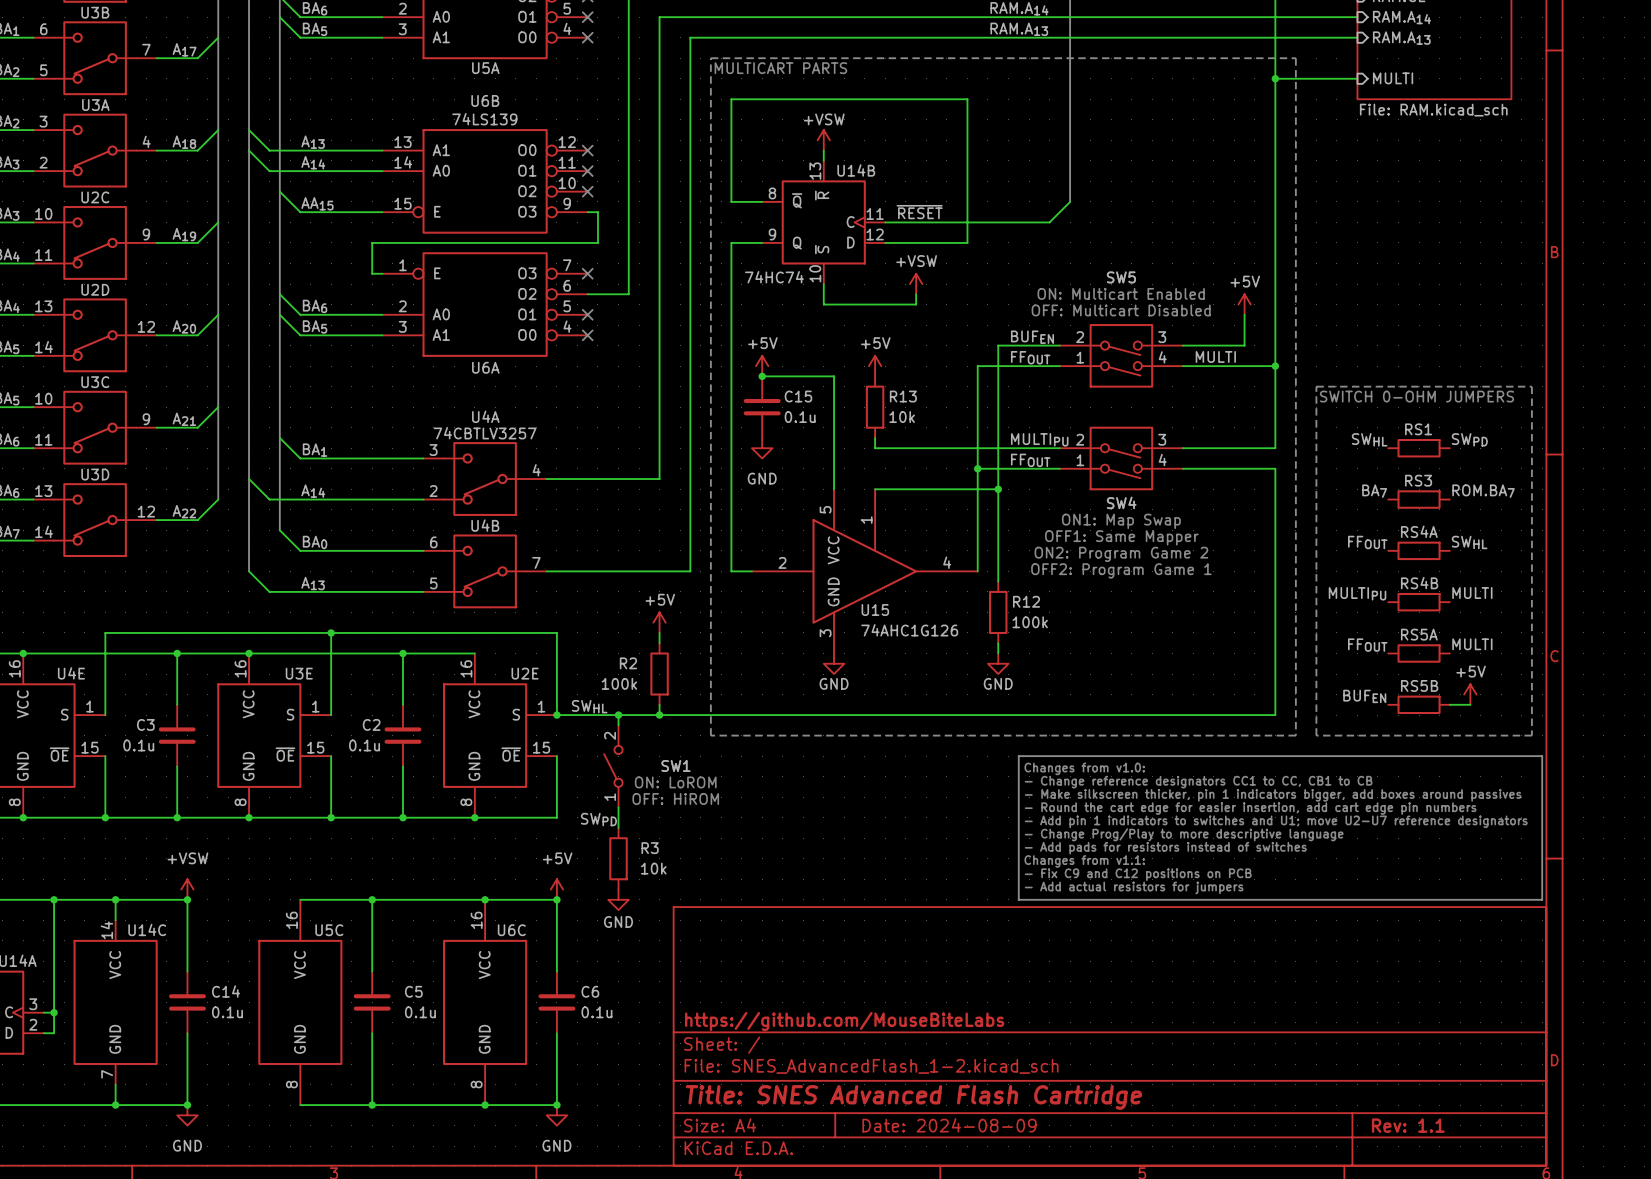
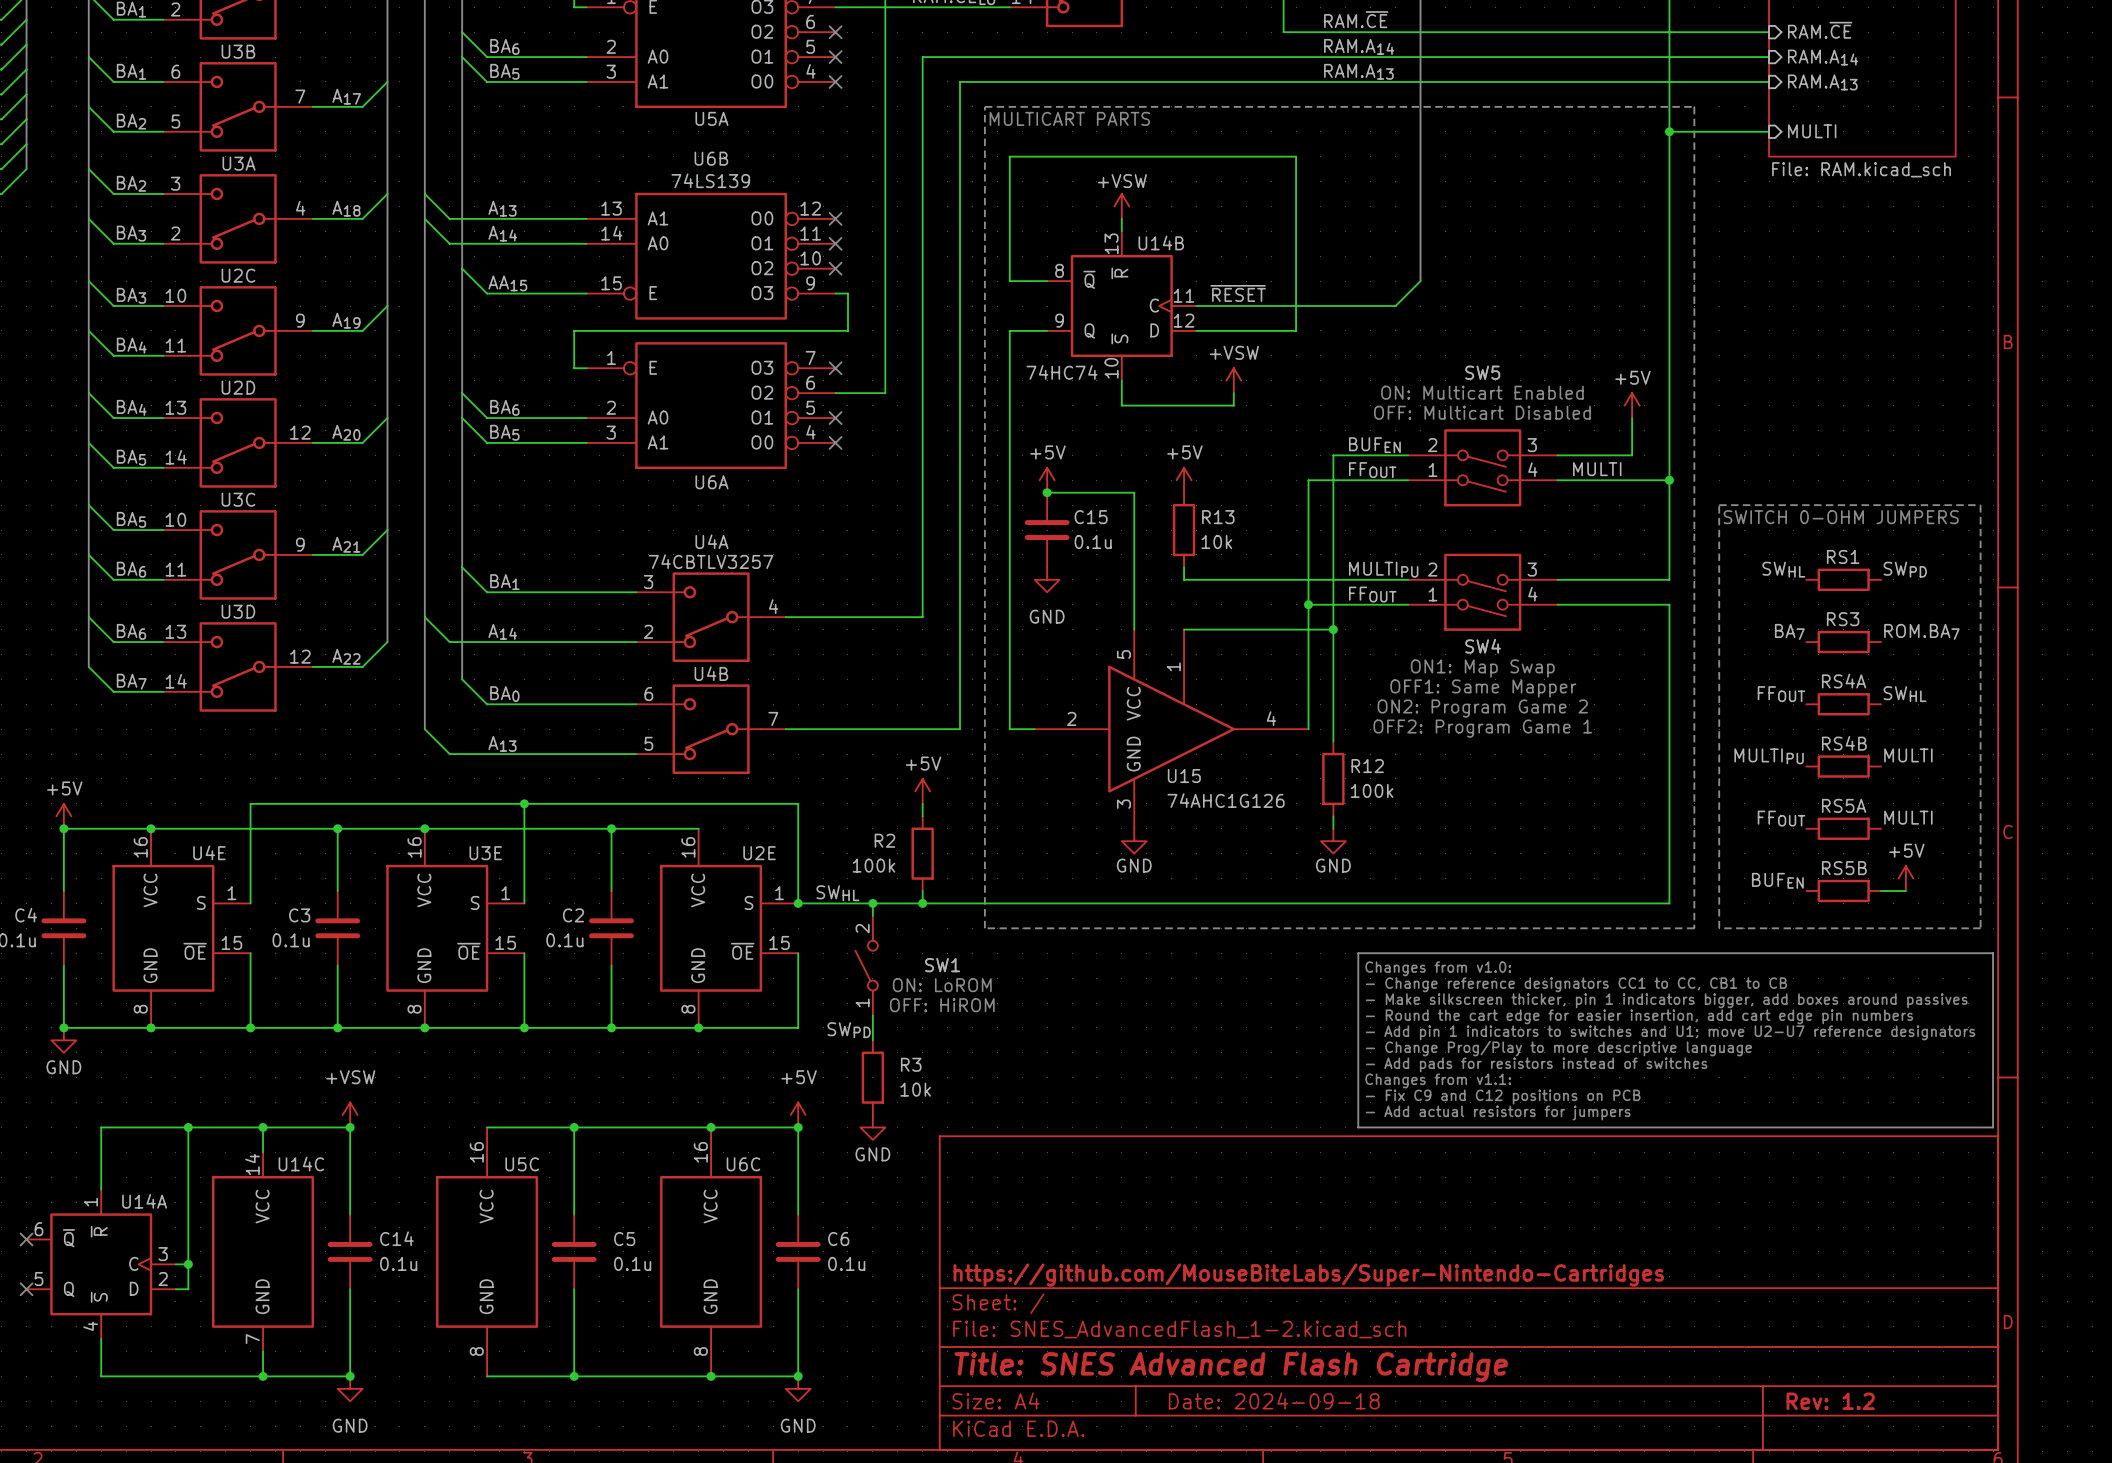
title block: https://github.com/MouseBiteLabs (844, 1021) -> https://github.com/MouseBiteLabs/Super-Nintendo-Cartridges (1308, 1275)
title block: Date: 2024-08-09 (949, 1125) -> Date: 2024-09-18 (1274, 1400)
title block: Rev: 1.1 (1408, 1125) -> Rev: 1.2 (1830, 1401)

